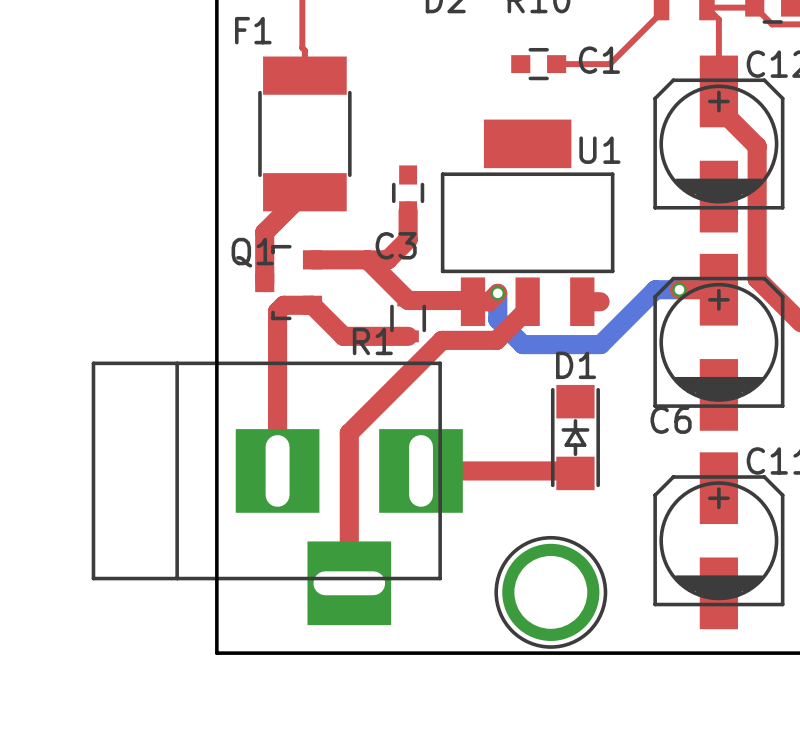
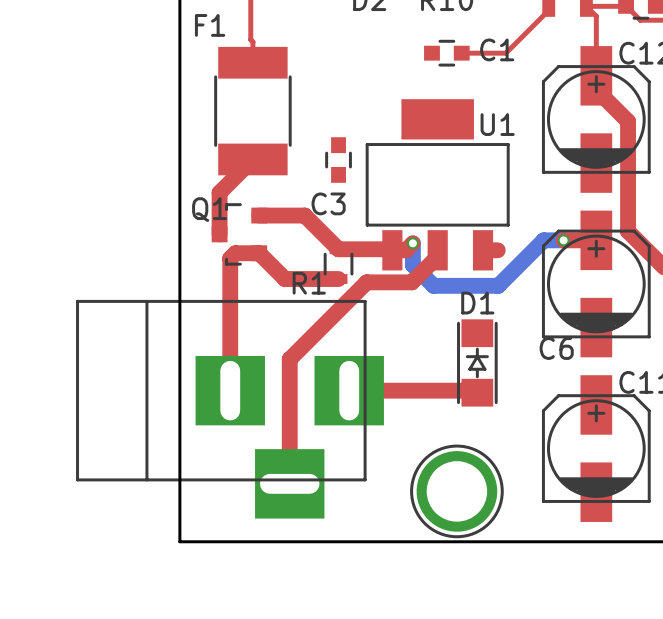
top track: (408, 210) (408, 239) (387, 259) (367, 259) -> none

